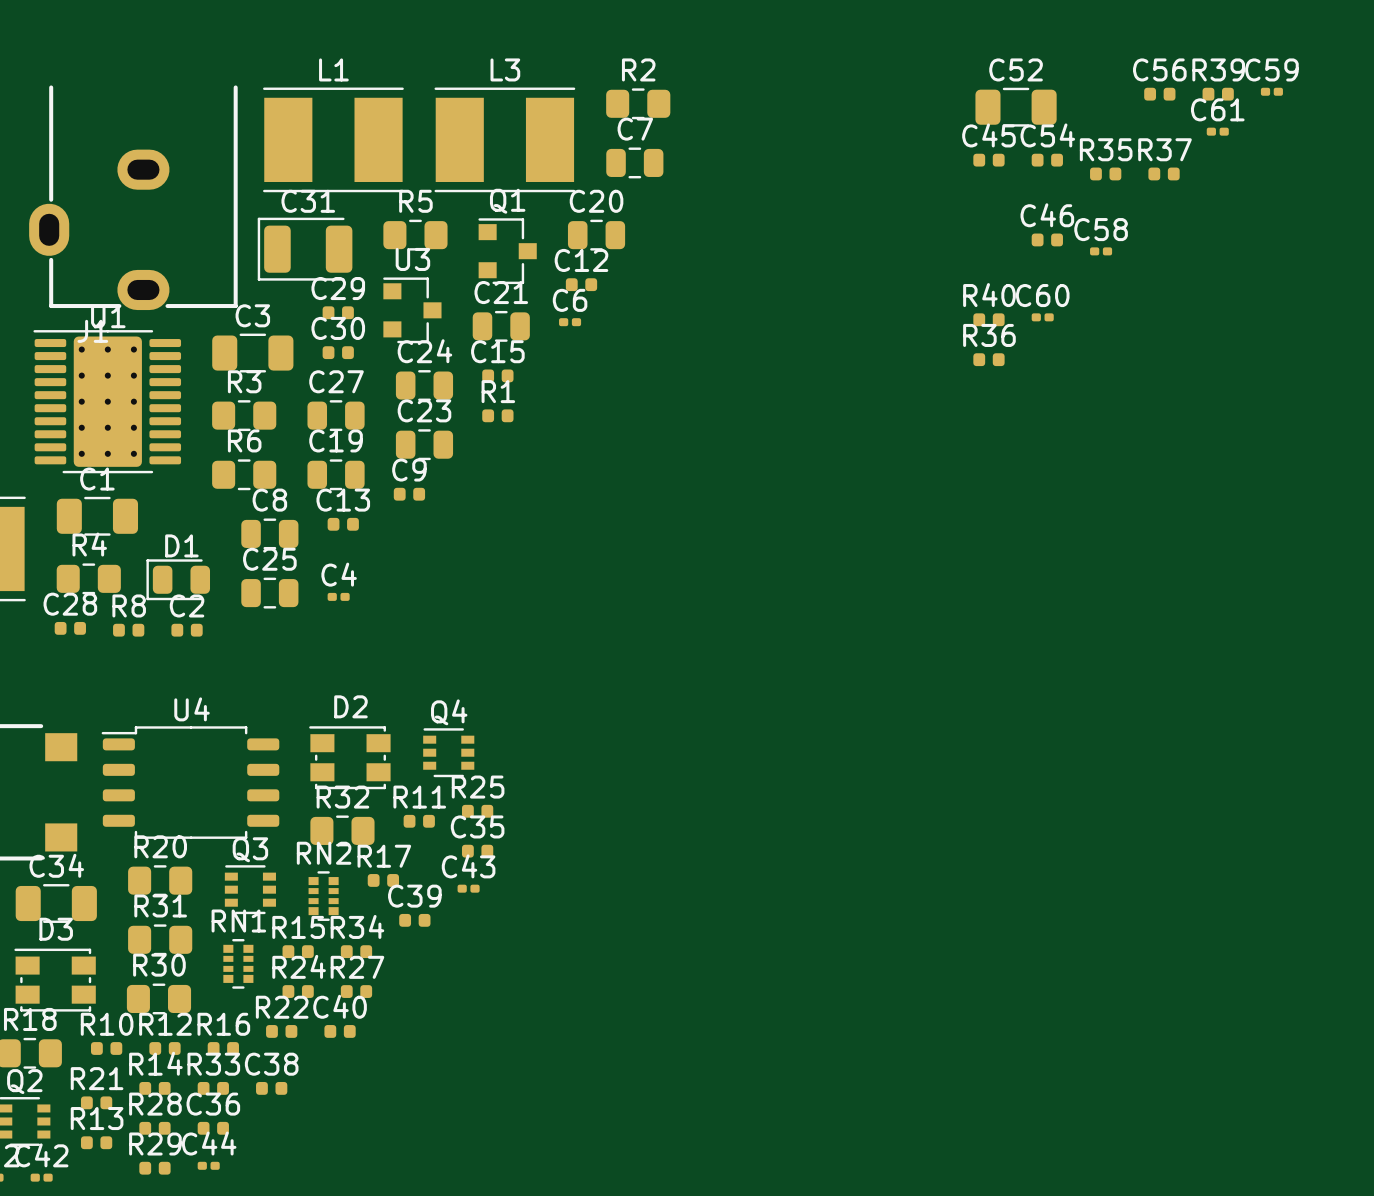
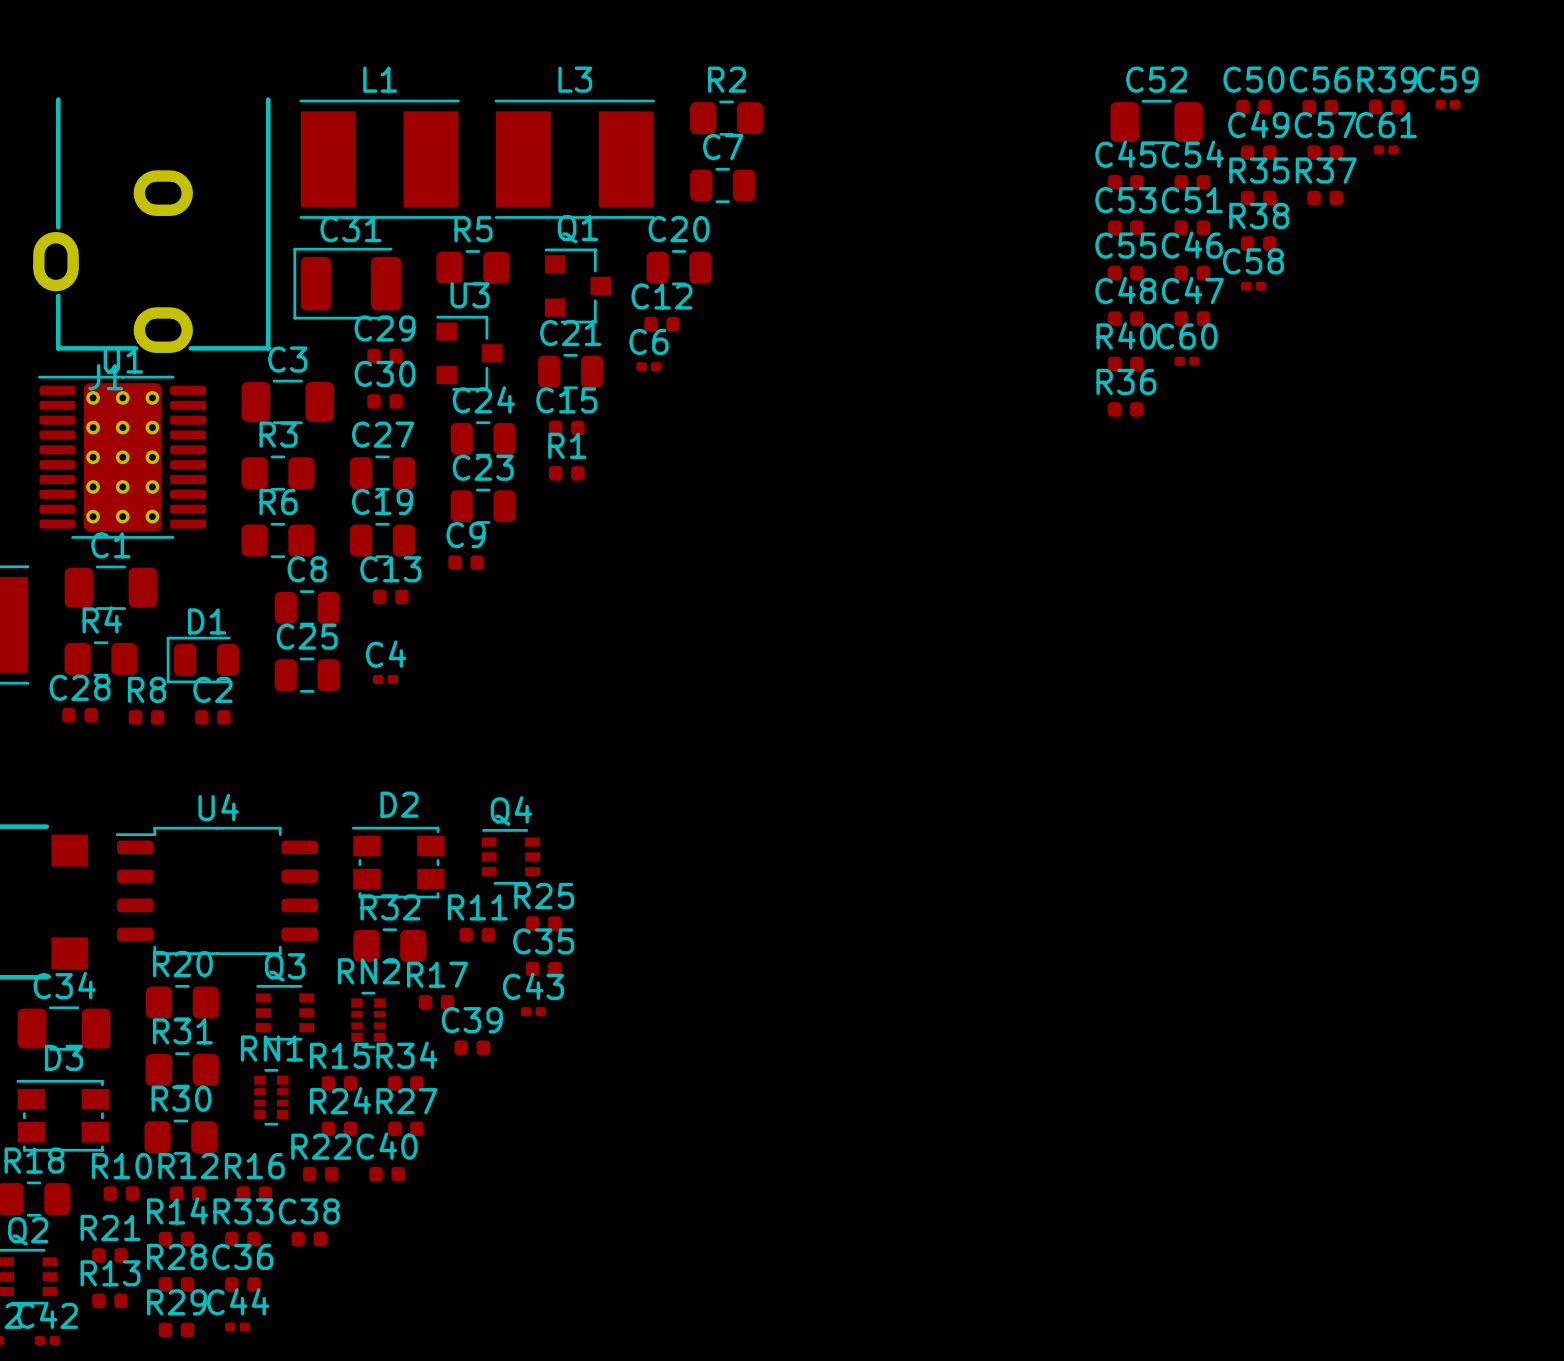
C50: none -> (1253, 107)
C49: none -> (1258, 152)
C57: none -> (1325, 152)
C53: none -> (1125, 227)
C51: none -> (1192, 227)
R38: none -> (1258, 243)
C55: none -> (1125, 273)
C48: none -> (1125, 318)
C47: none -> (1192, 318)

